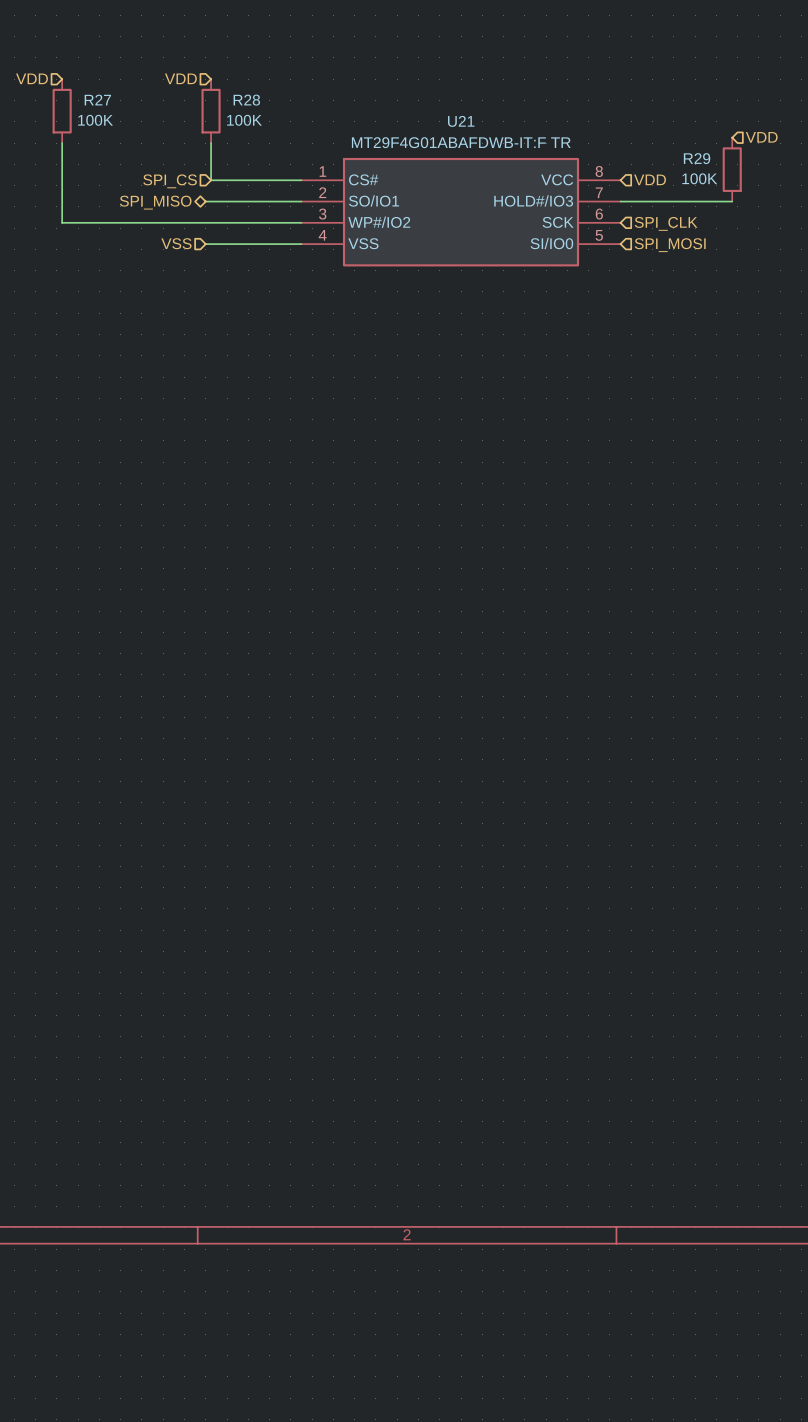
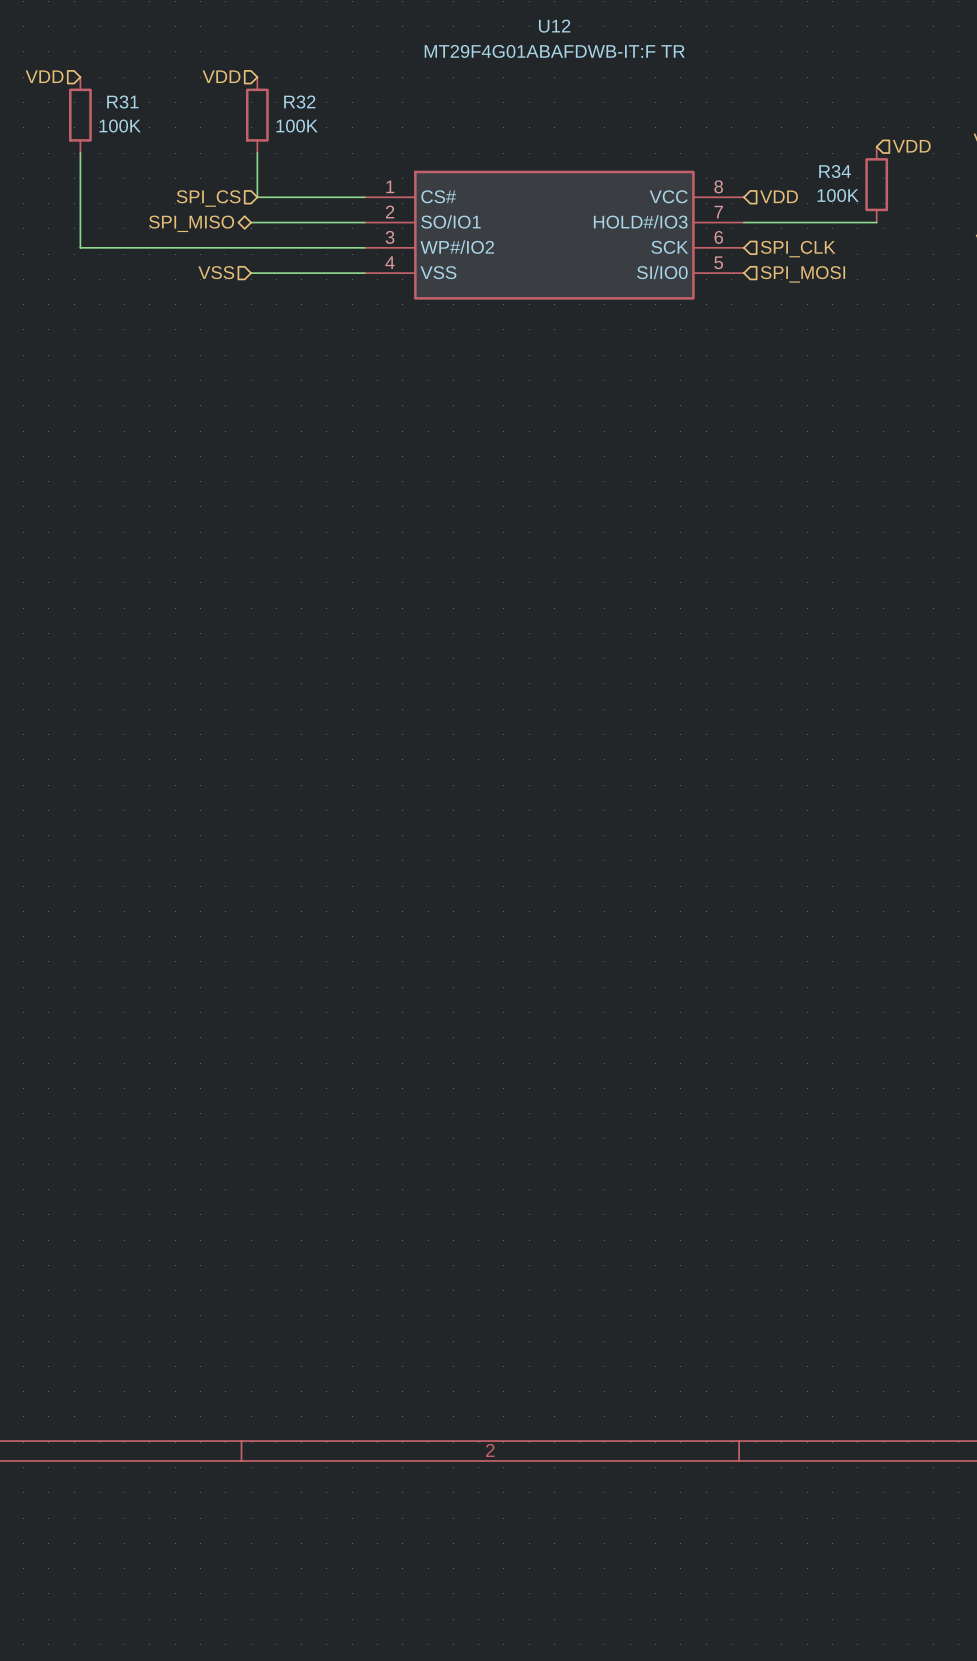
R27 name: R27 (97, 100) -> R31 (122, 102)
R28 name: R28 (246, 100) -> R32 (299, 102)
U21 name: U21 (461, 121) -> U12 (554, 26)
U21 value position: MT29F4G01ABAFDWB-IT:F TR (461, 142) -> MT29F4G01ABAFDWB-IT:F TR (554, 51)
R29 name: R29 (697, 158) -> R34 (835, 171)

